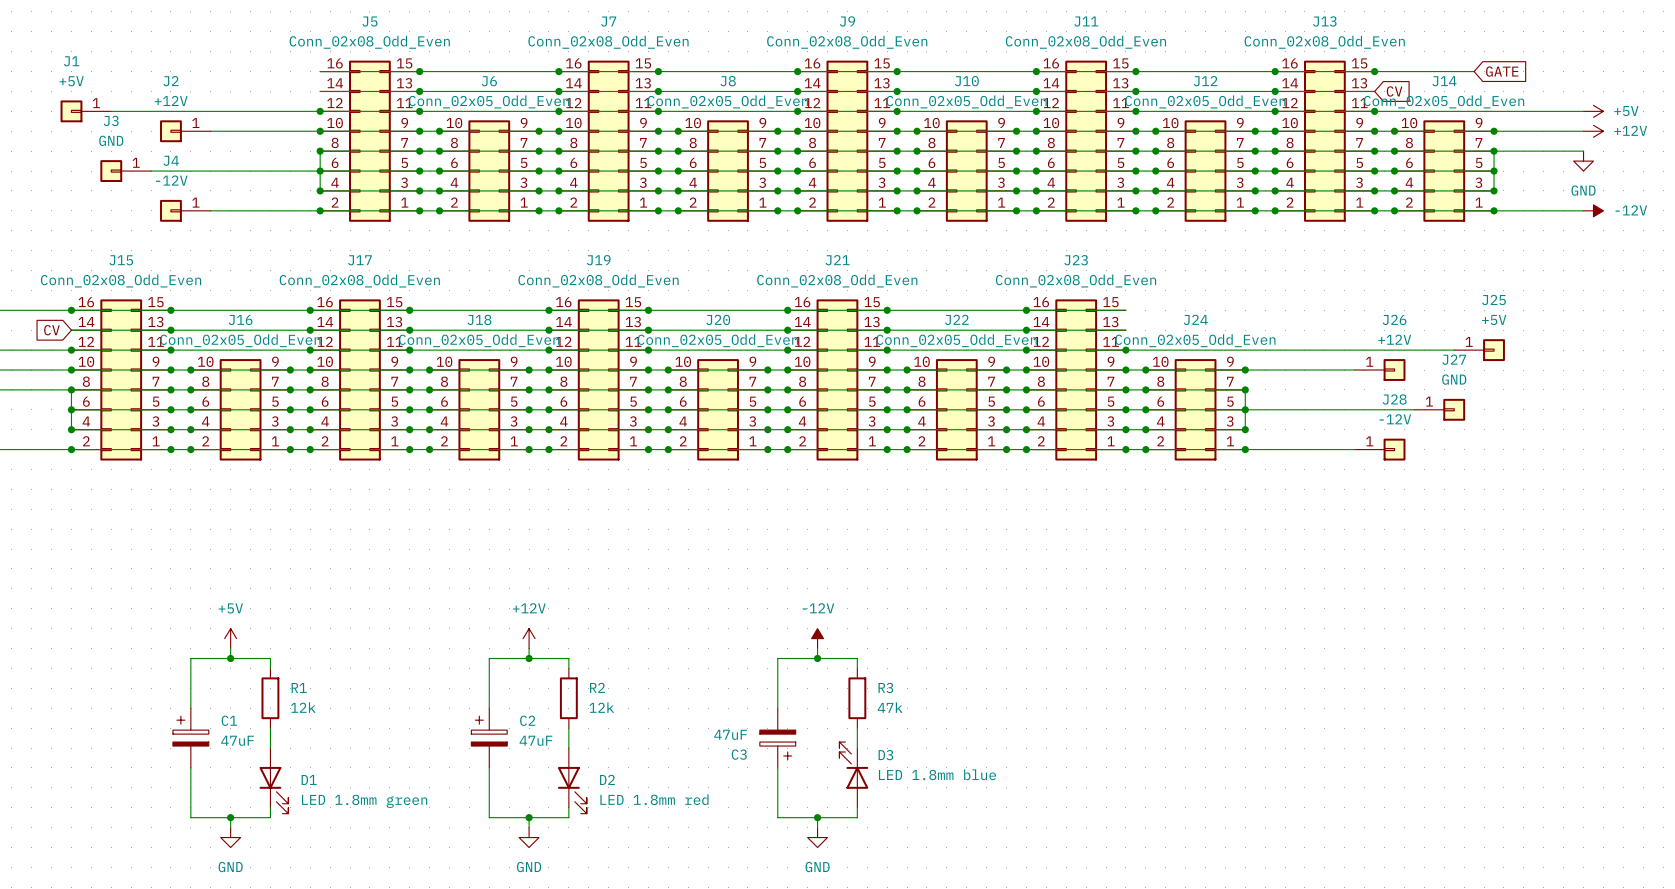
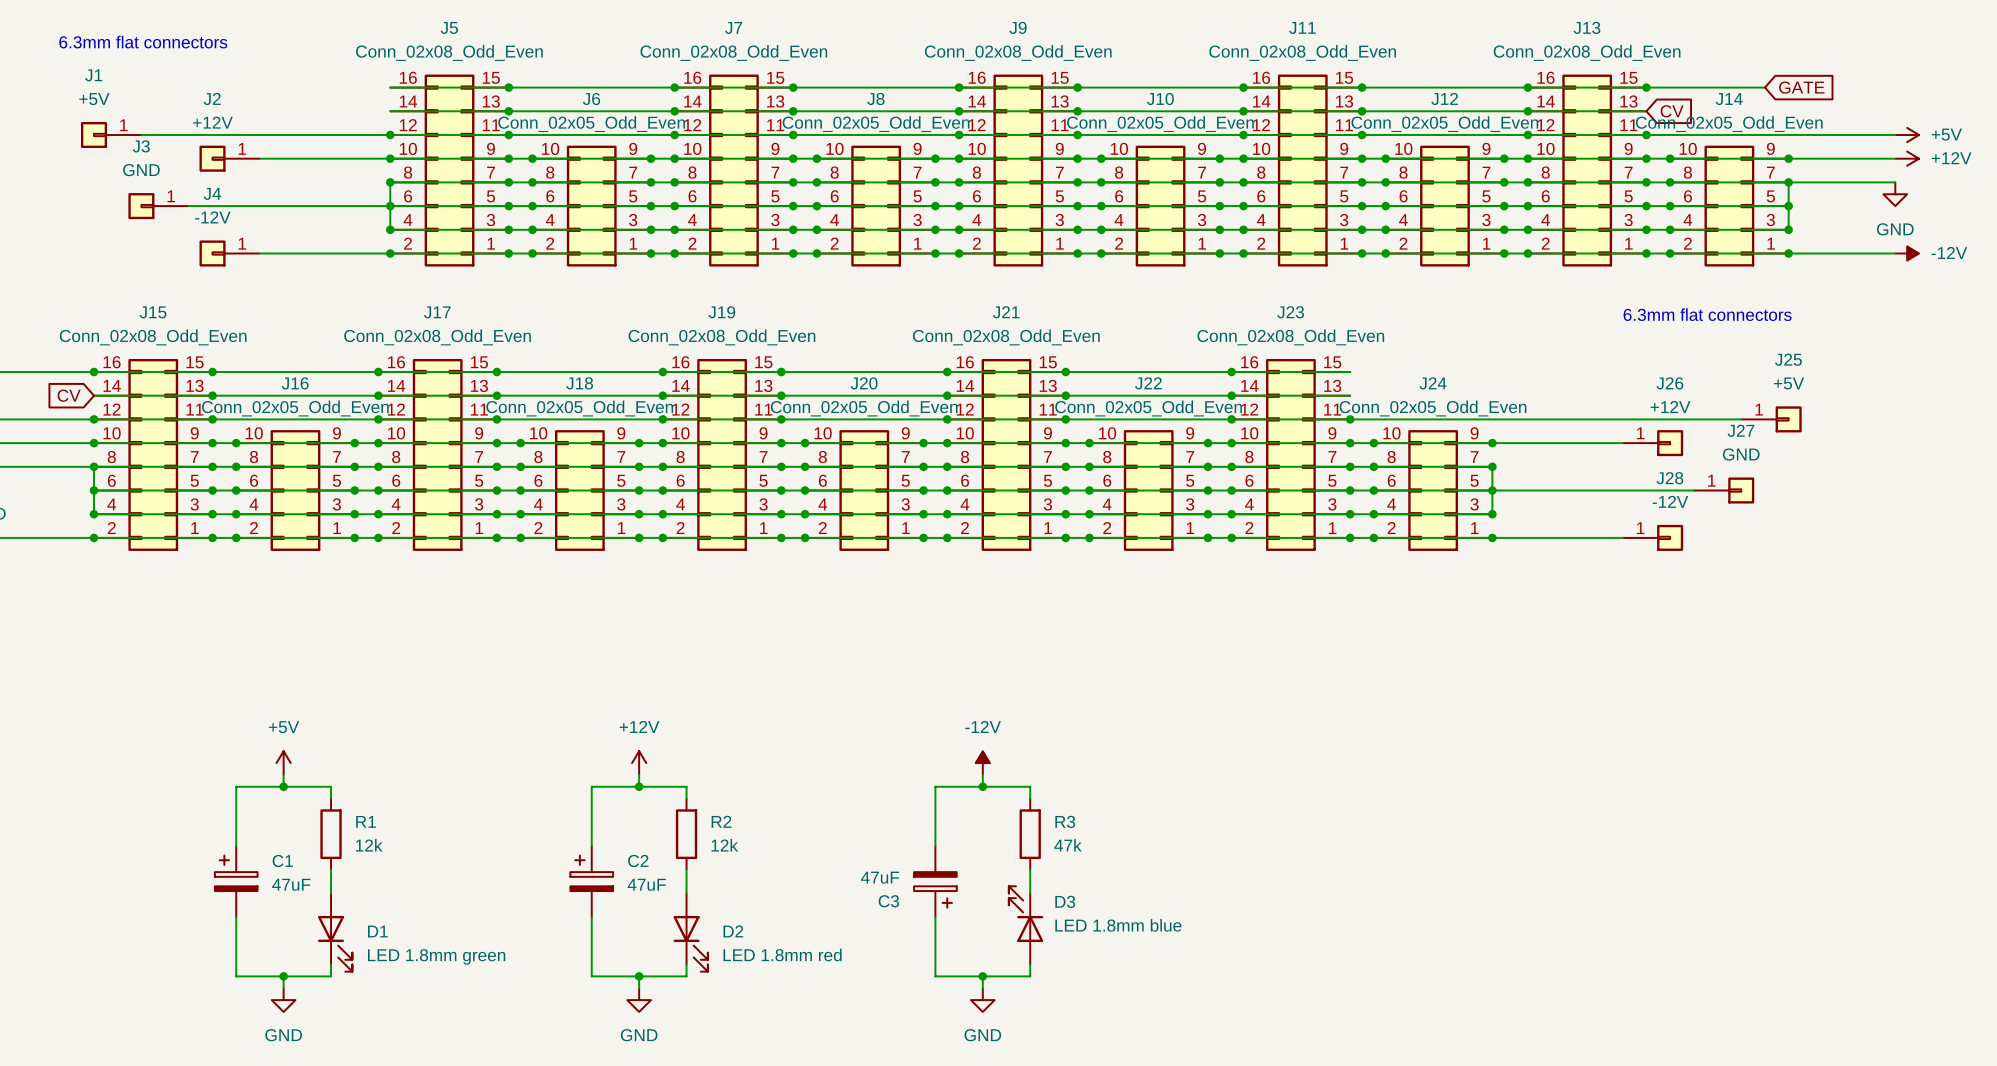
text: none -> 6.3mm flat connectors (143, 42)
text: none -> 6.3mm flat connectors (1707, 314)

